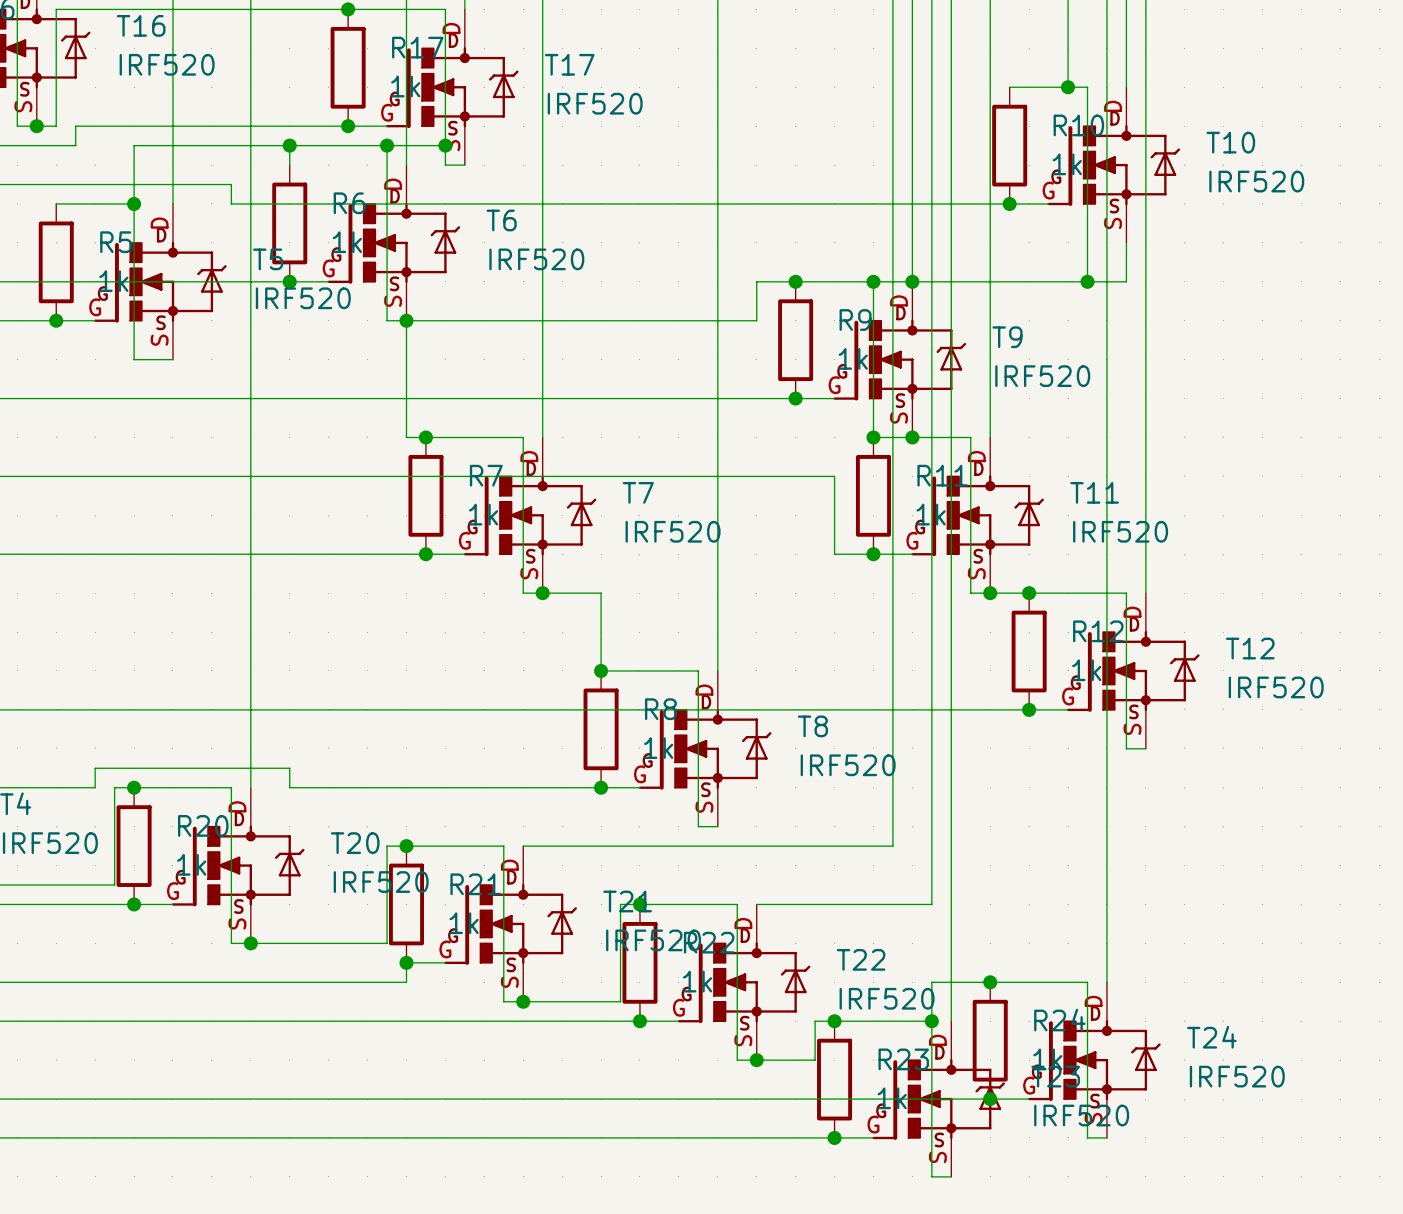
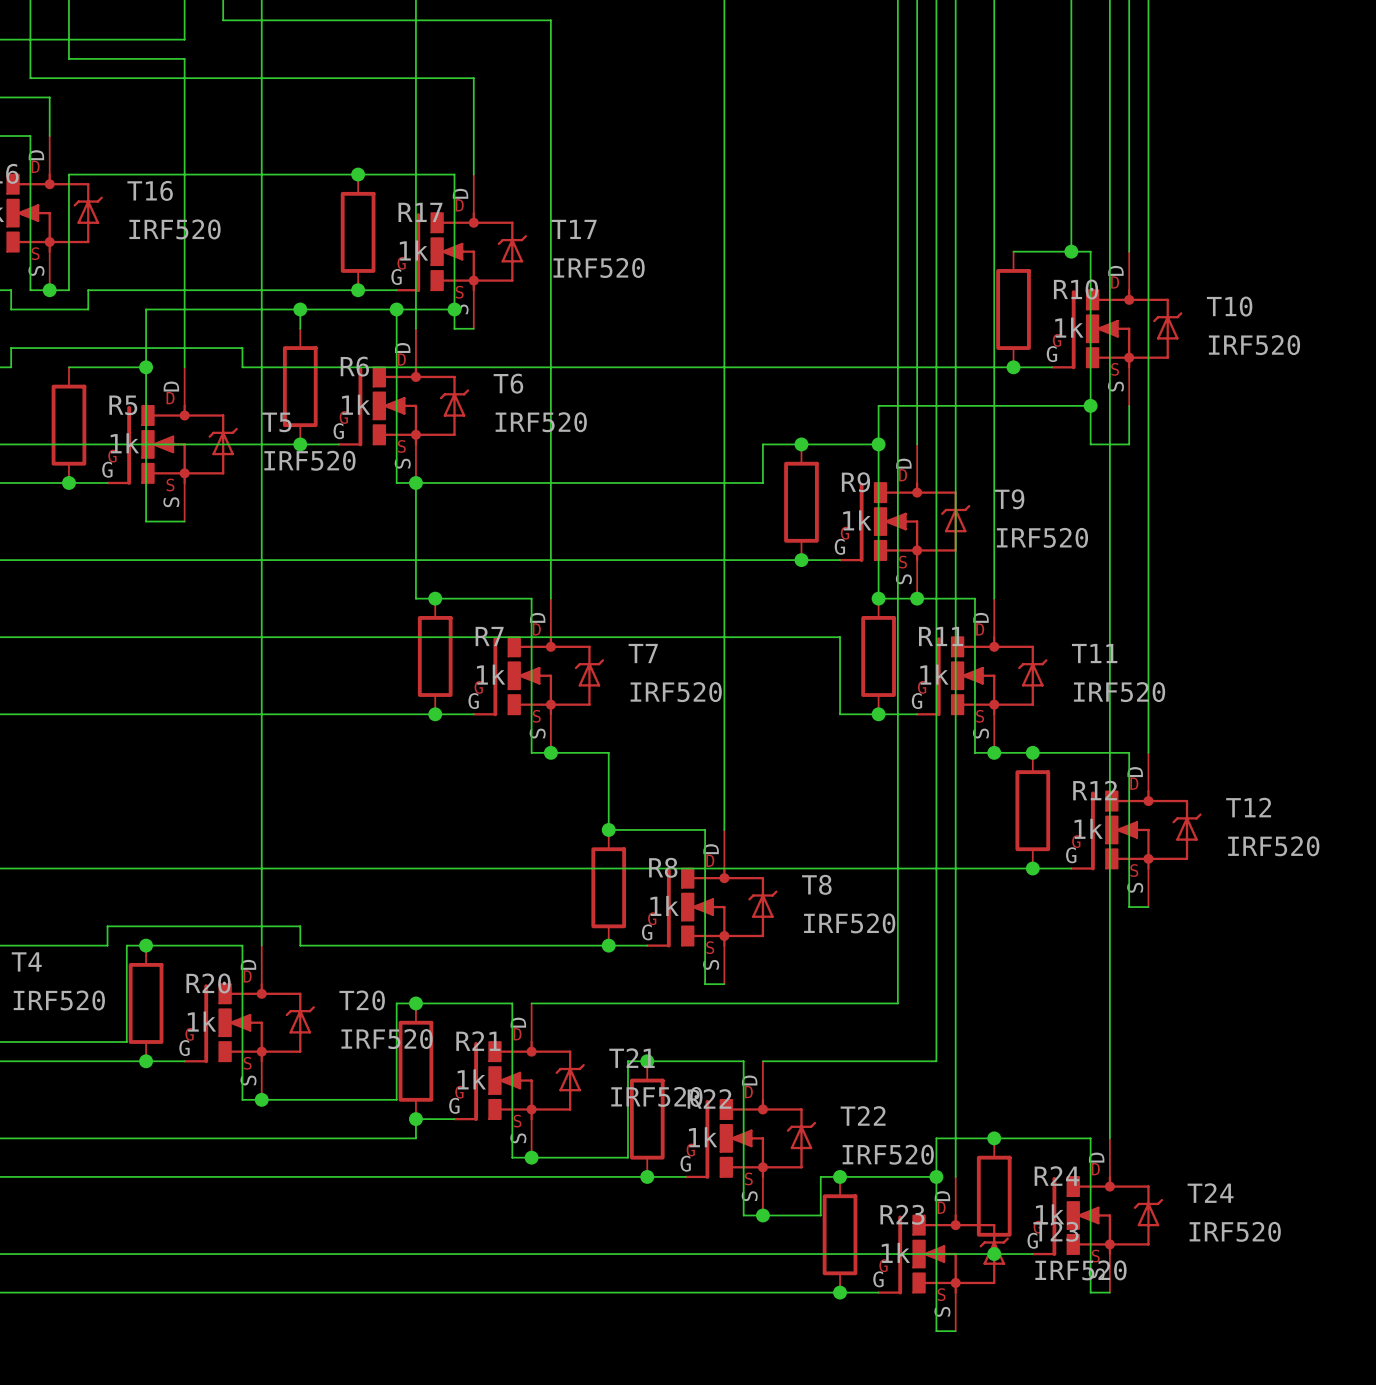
wire: (873, 281) (1087, 281) -> (878, 444) (878, 405) (1090, 405)
junction: (912, 281) -> none
junction position: (1087, 281) -> (1090, 405)

